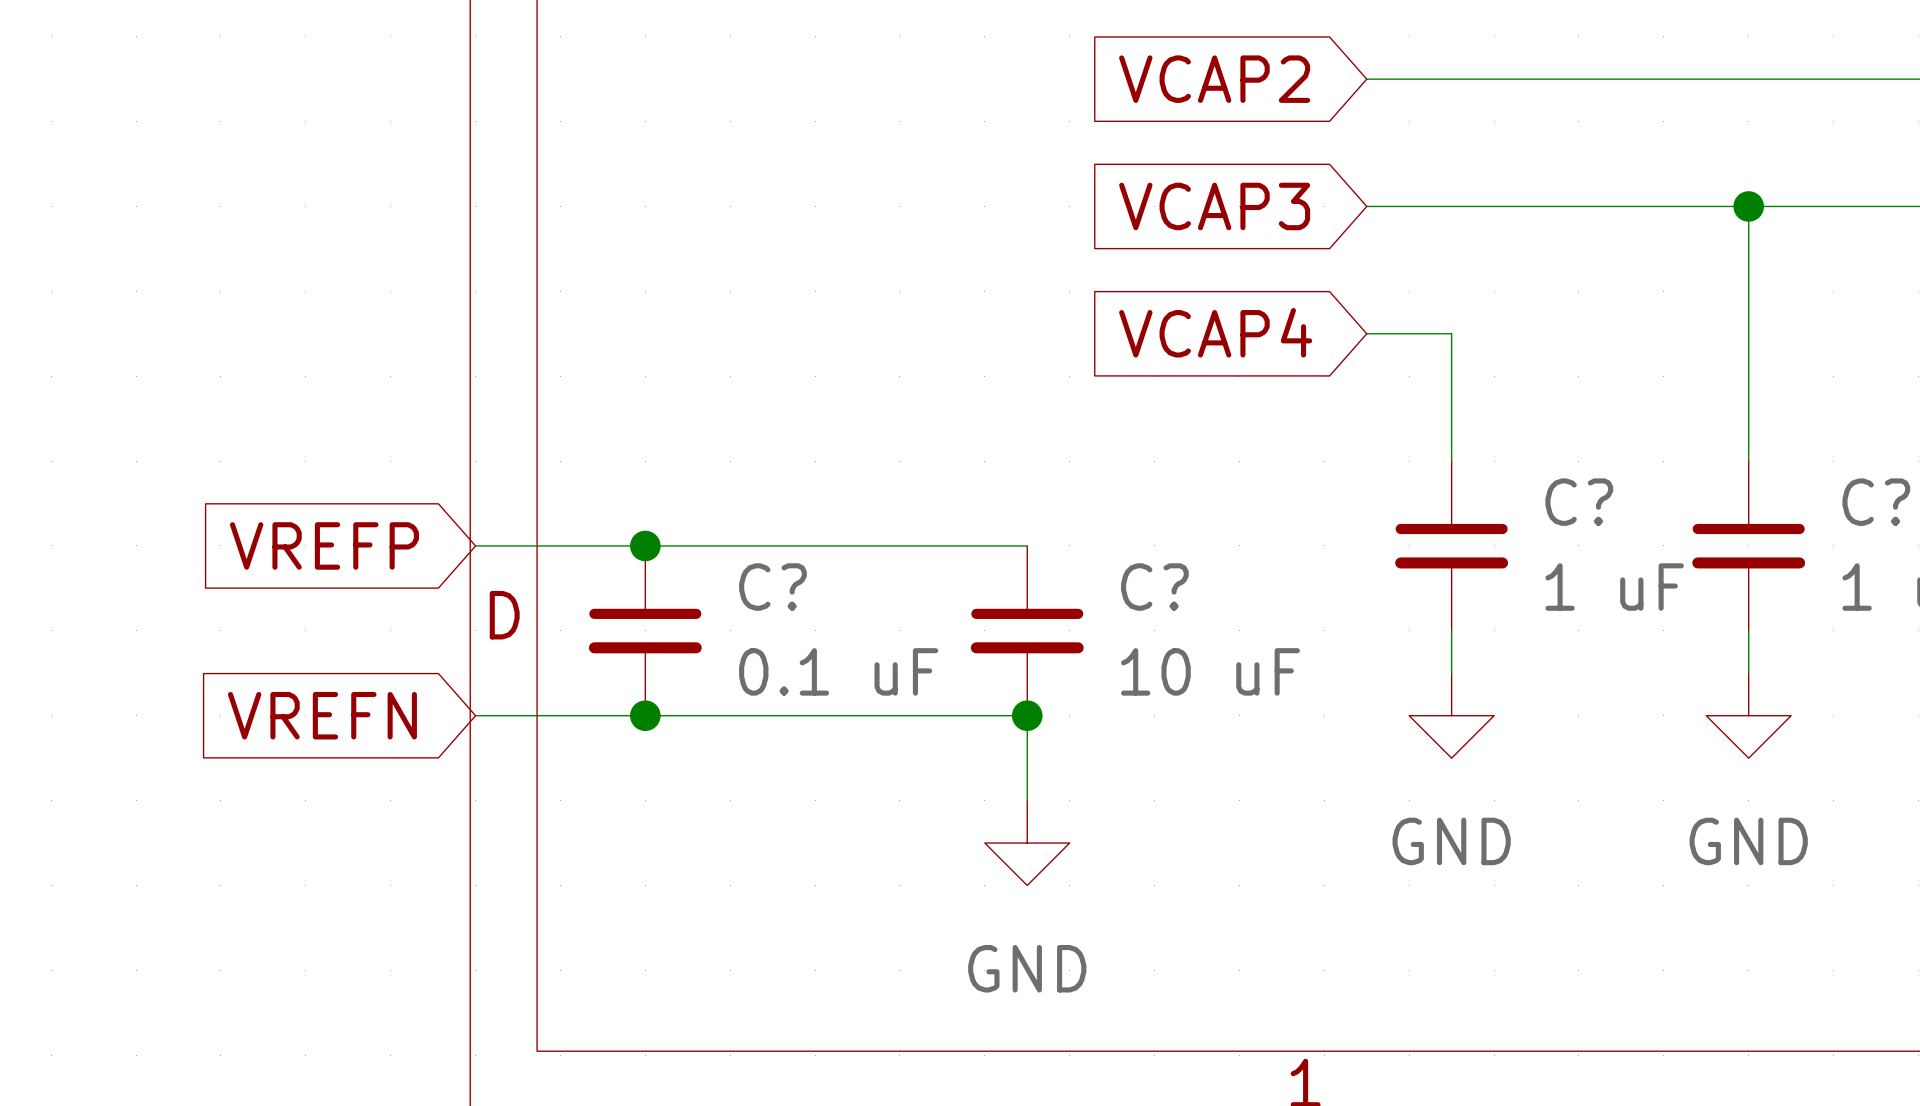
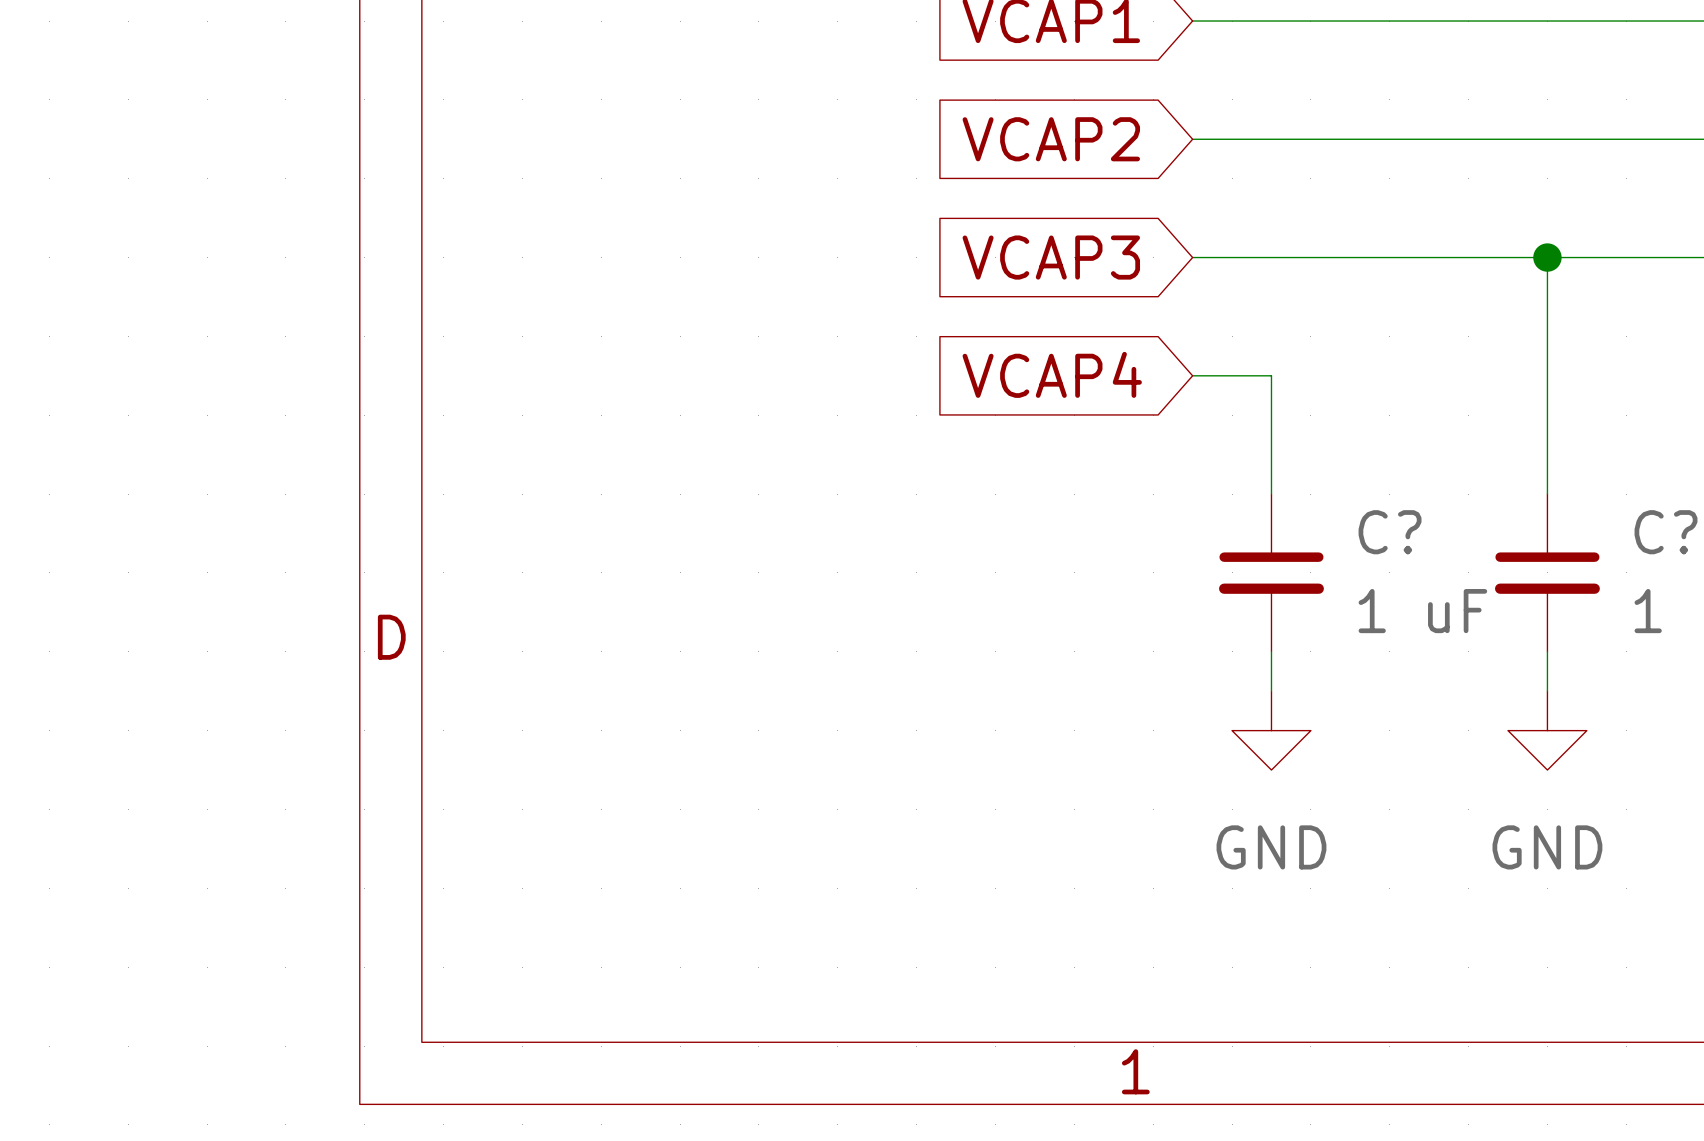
global label: VREFP (324, 545) -> none
wire: (475, 545) (1027, 545) -> none
junction: (645, 545) -> none
C?: 0.1 uF (645, 630) -> none
C?: 10 uF (1027, 630) -> none
global label: VREFN (322, 715) -> none
wire: (475, 715) (1027, 715) (1027, 800) -> none
junction: (645, 715) -> none
junction: (1027, 715) -> none
power symbol: GND (1027, 843) -> none

